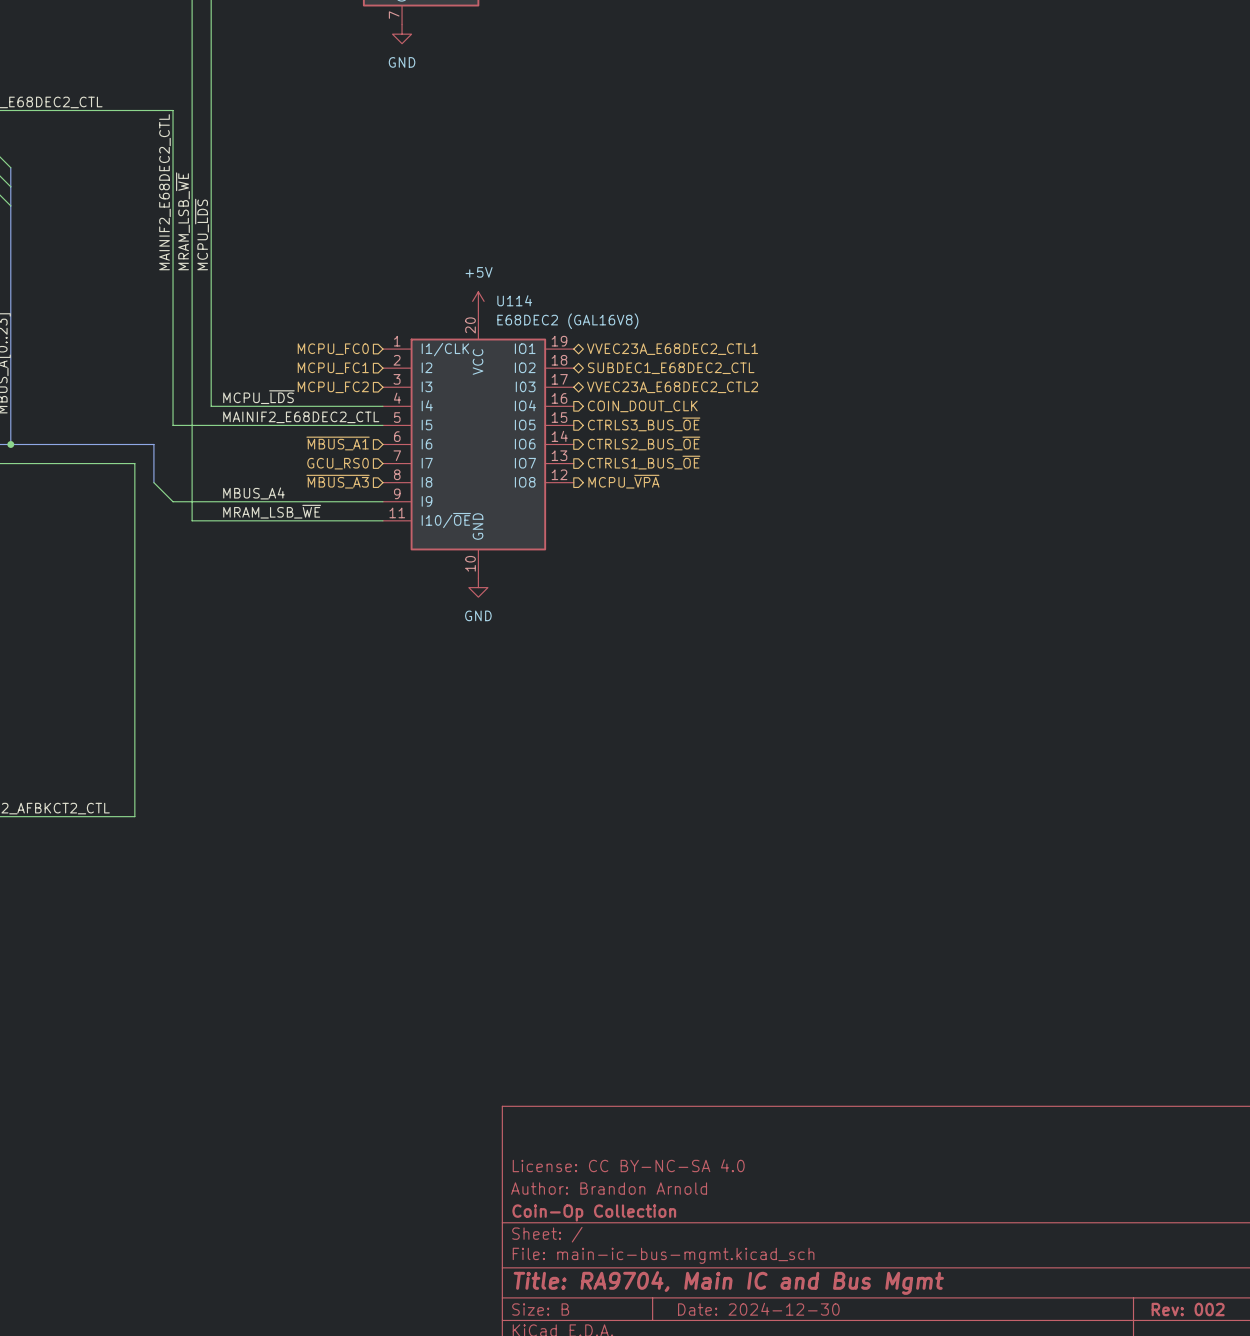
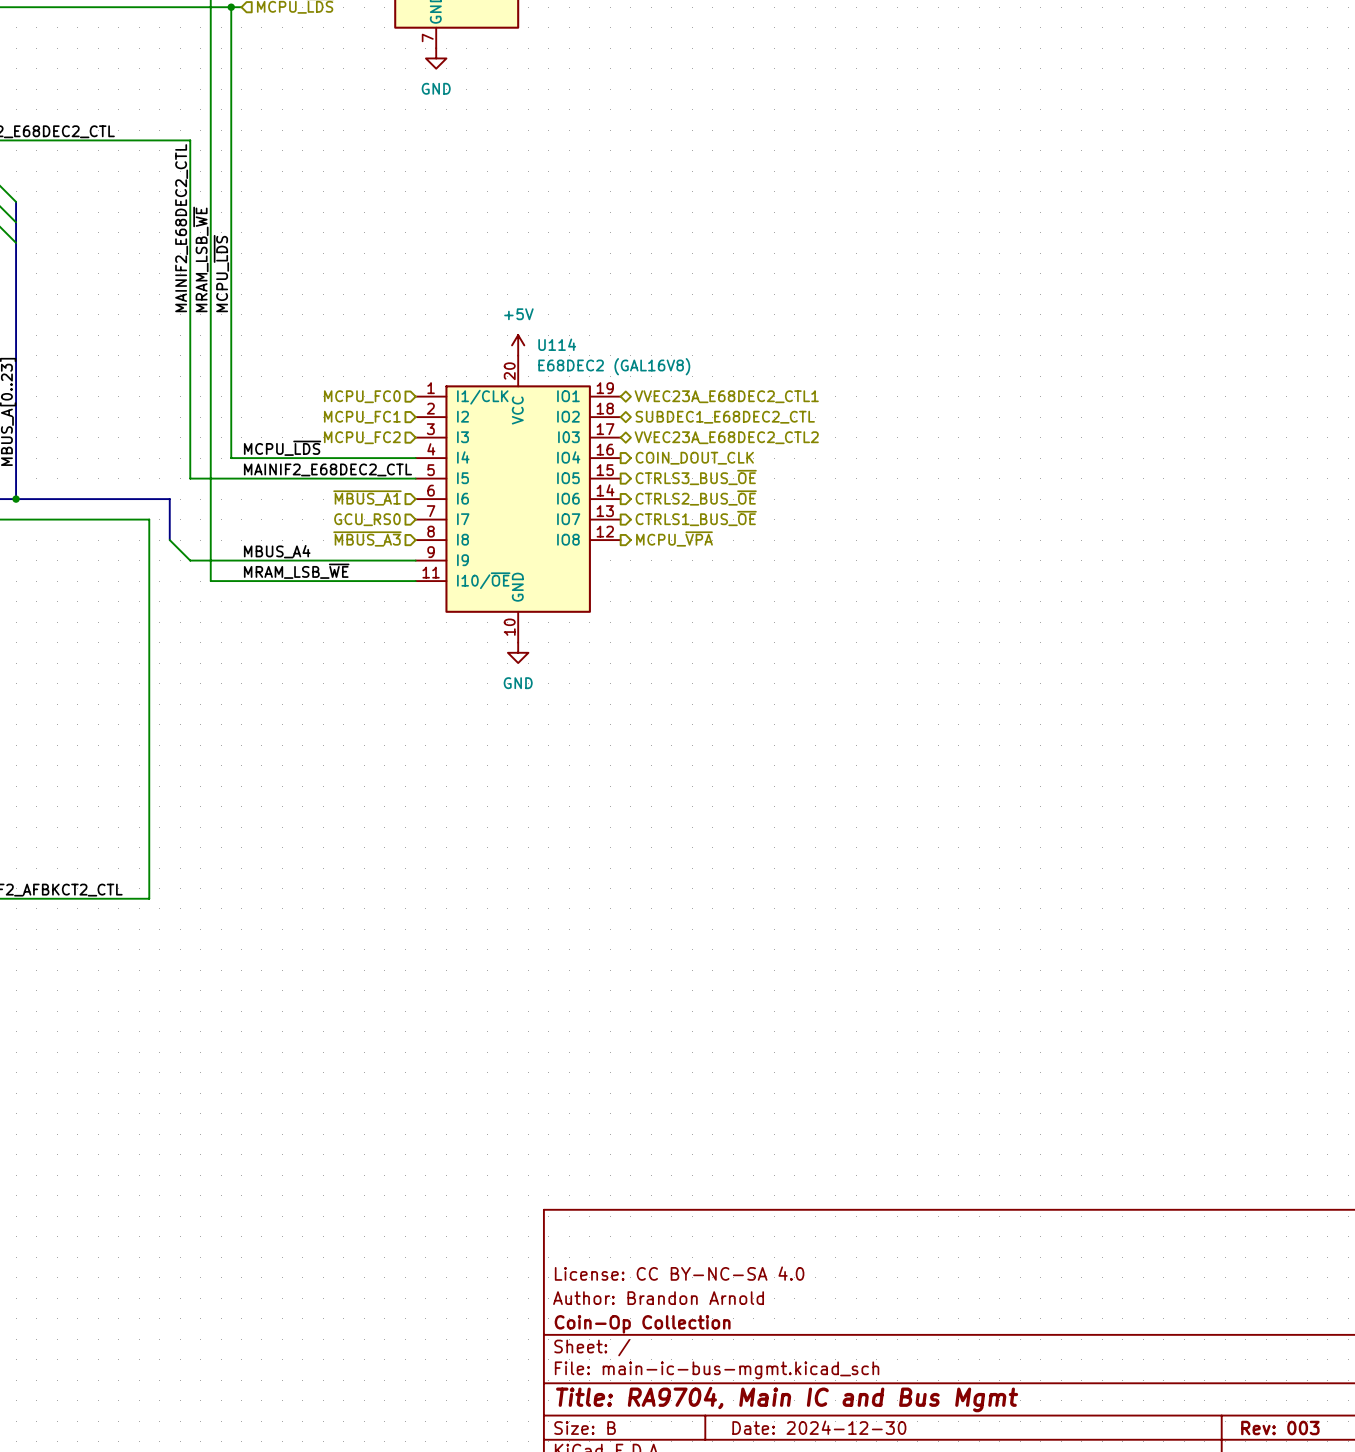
title block: Rev: 002 (1188, 1309) -> Rev: 003 (1280, 1428)

